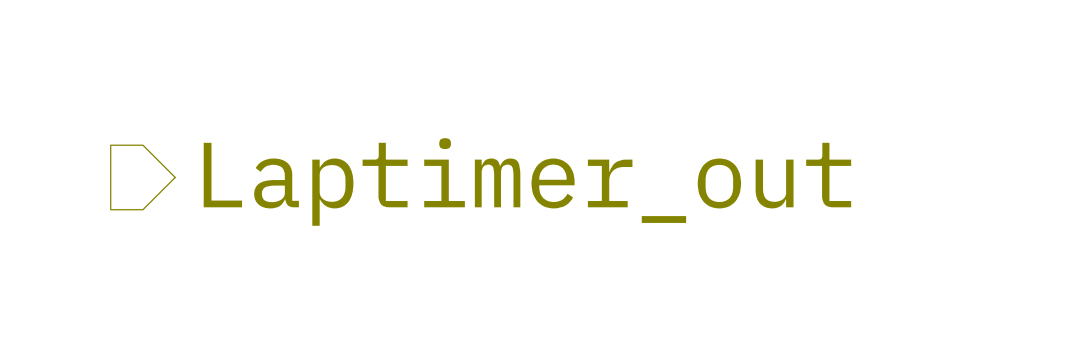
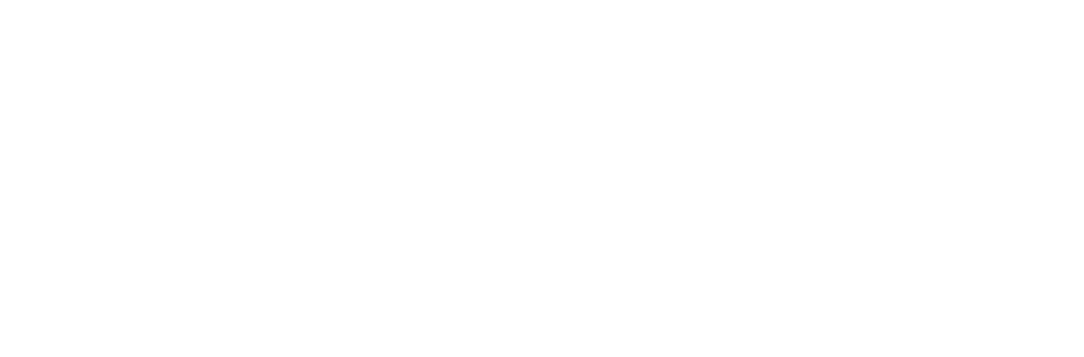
hierarchical label: Laptimer_out (527, 181) -> none

